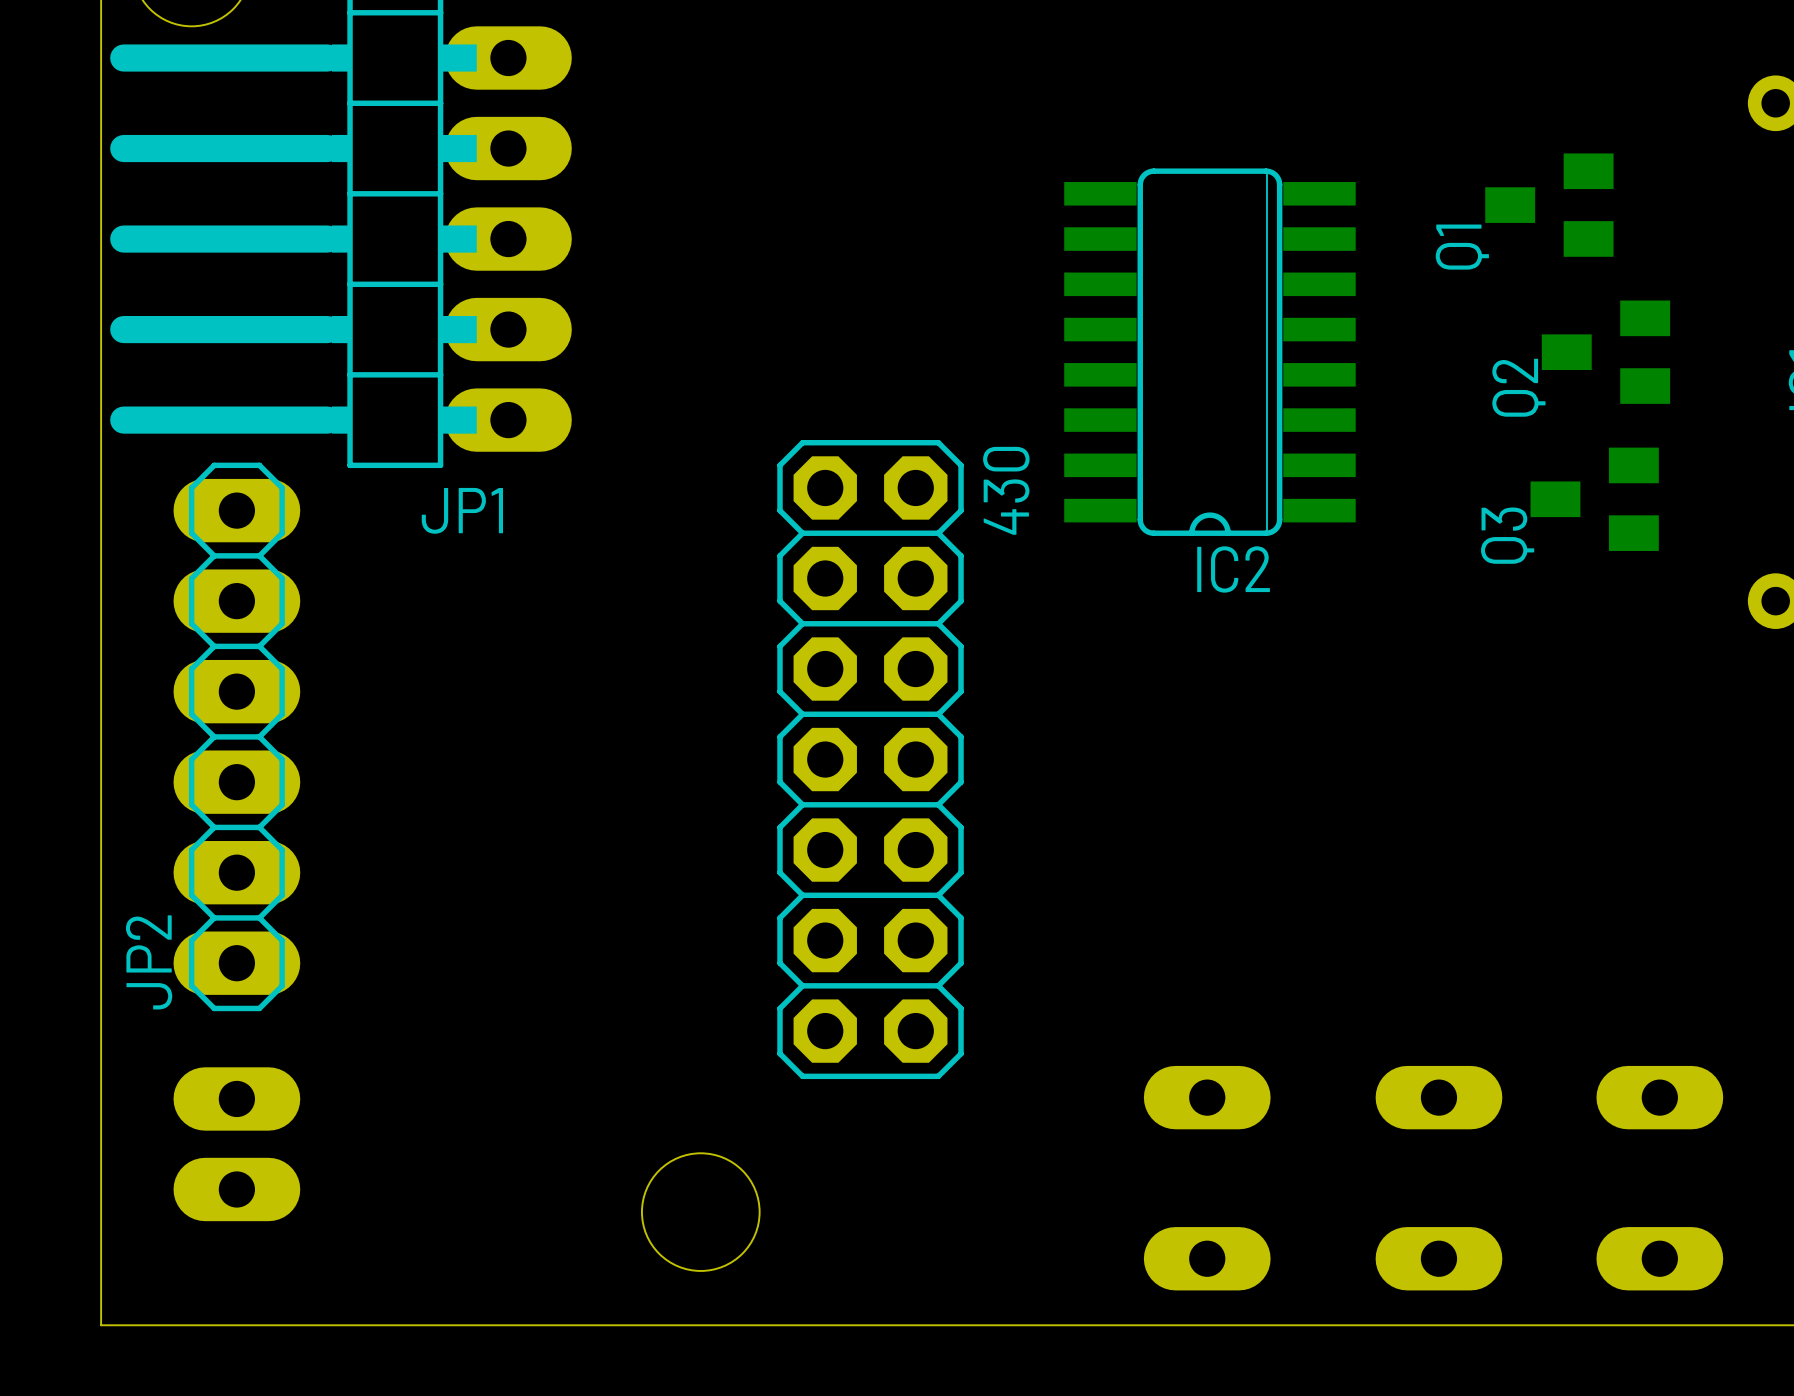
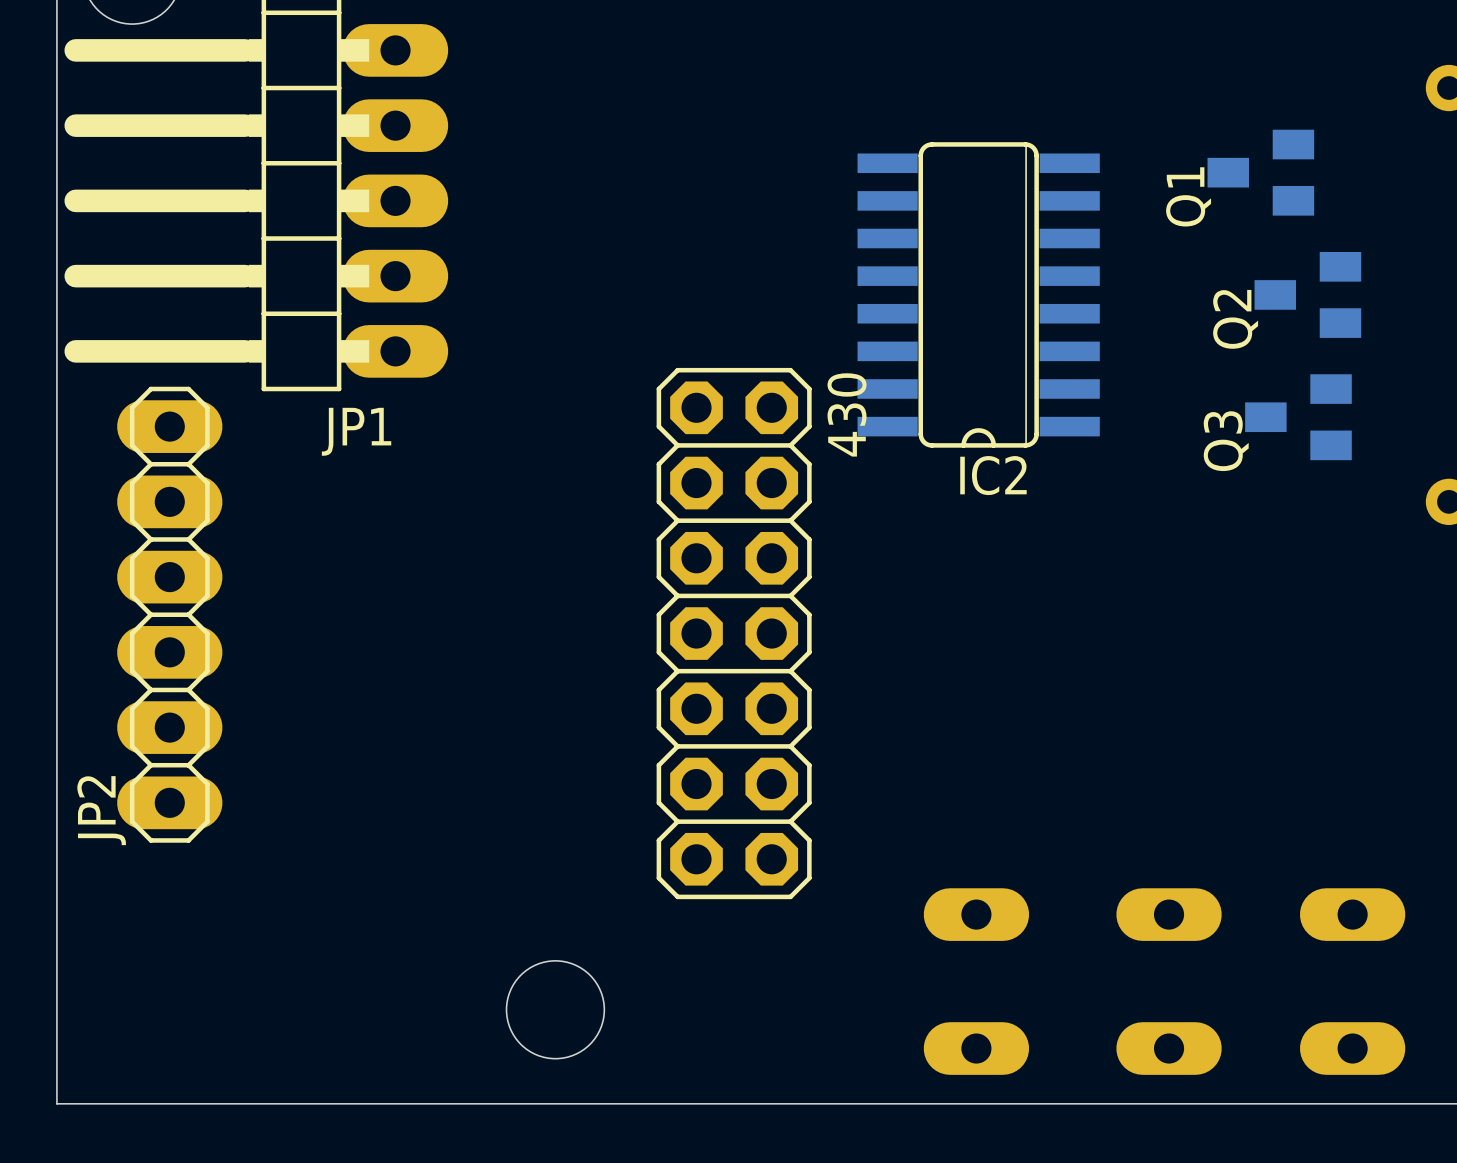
430 position: (870, 759) -> (734, 633)
part: (236, 1144) -> none

